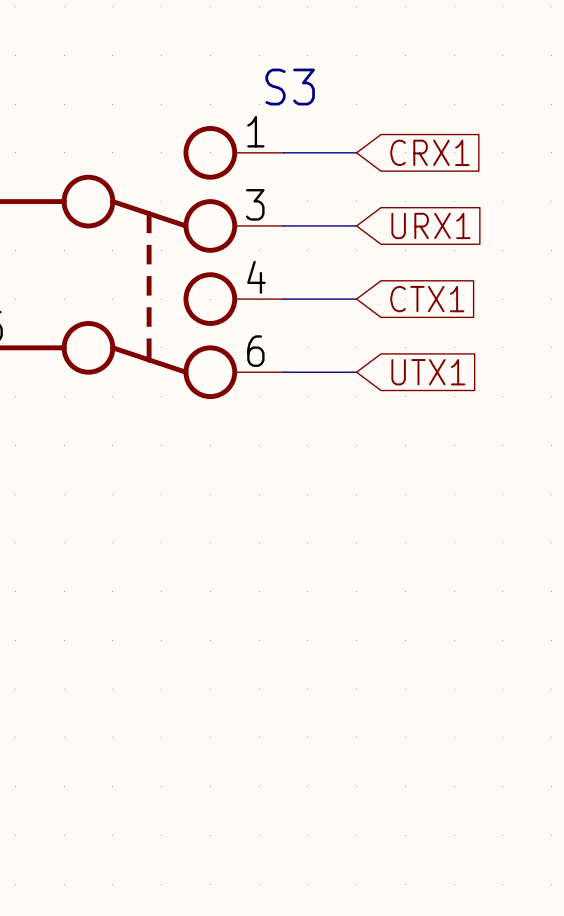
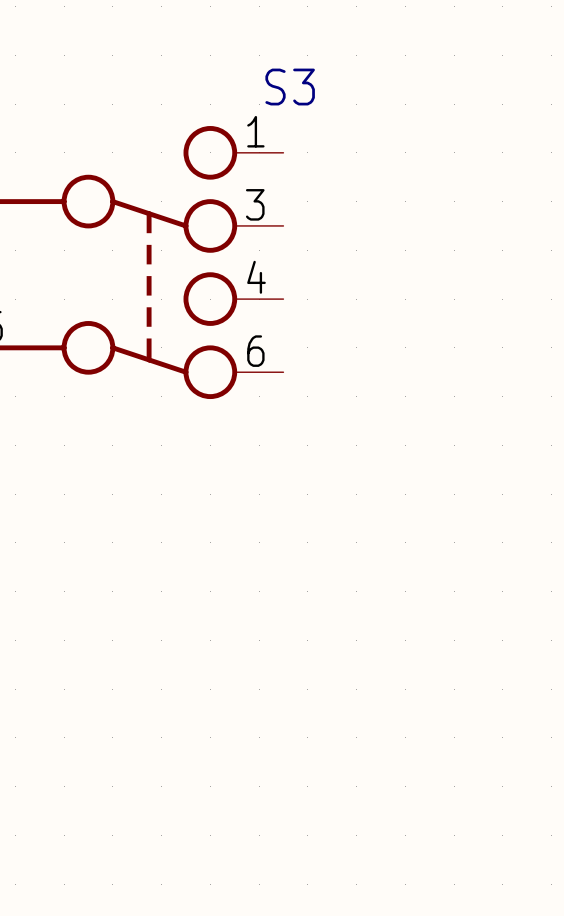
wire: (283, 152) (356, 152) -> none
global label: CRX1 (429, 152) -> none
wire: (283, 225) (356, 225) -> none
global label: URX1 (431, 225) -> none
wire: (283, 299) (356, 299) -> none
global label: CTX1 (427, 299) -> none
wire: (283, 372) (356, 372) -> none
global label: UTX1 (428, 372) -> none

